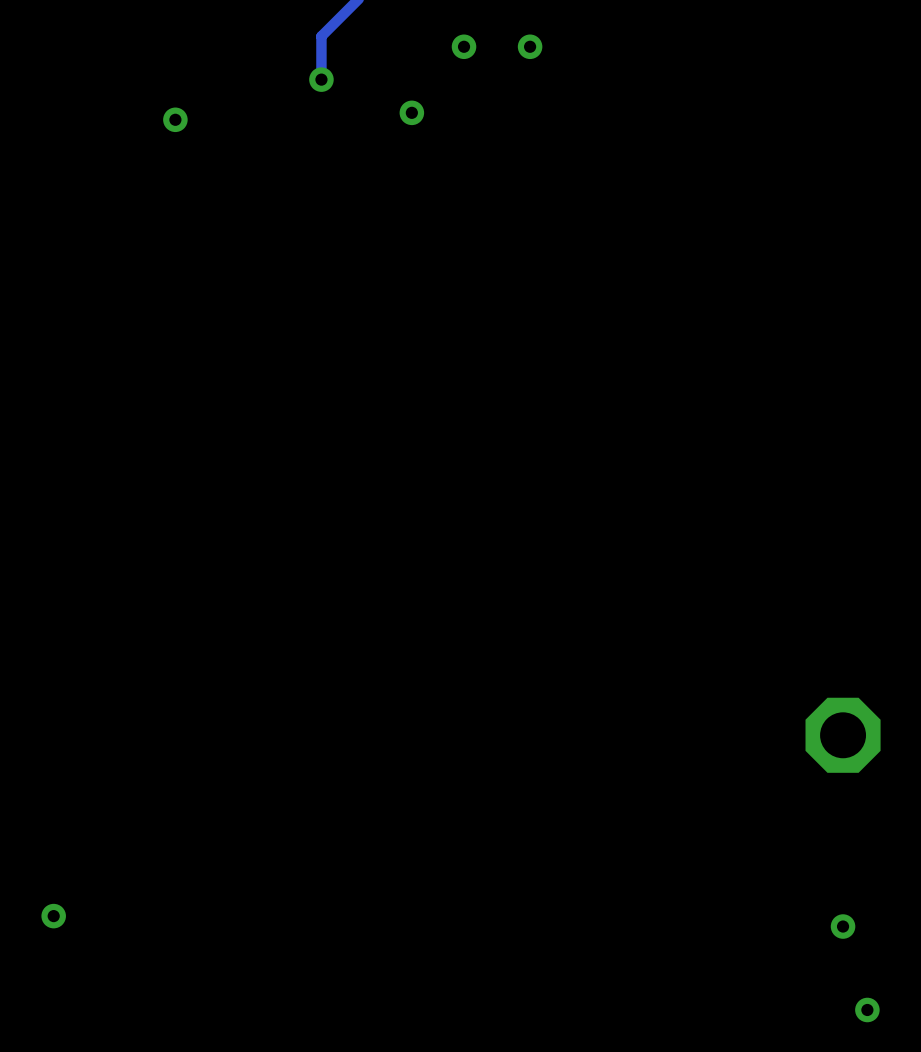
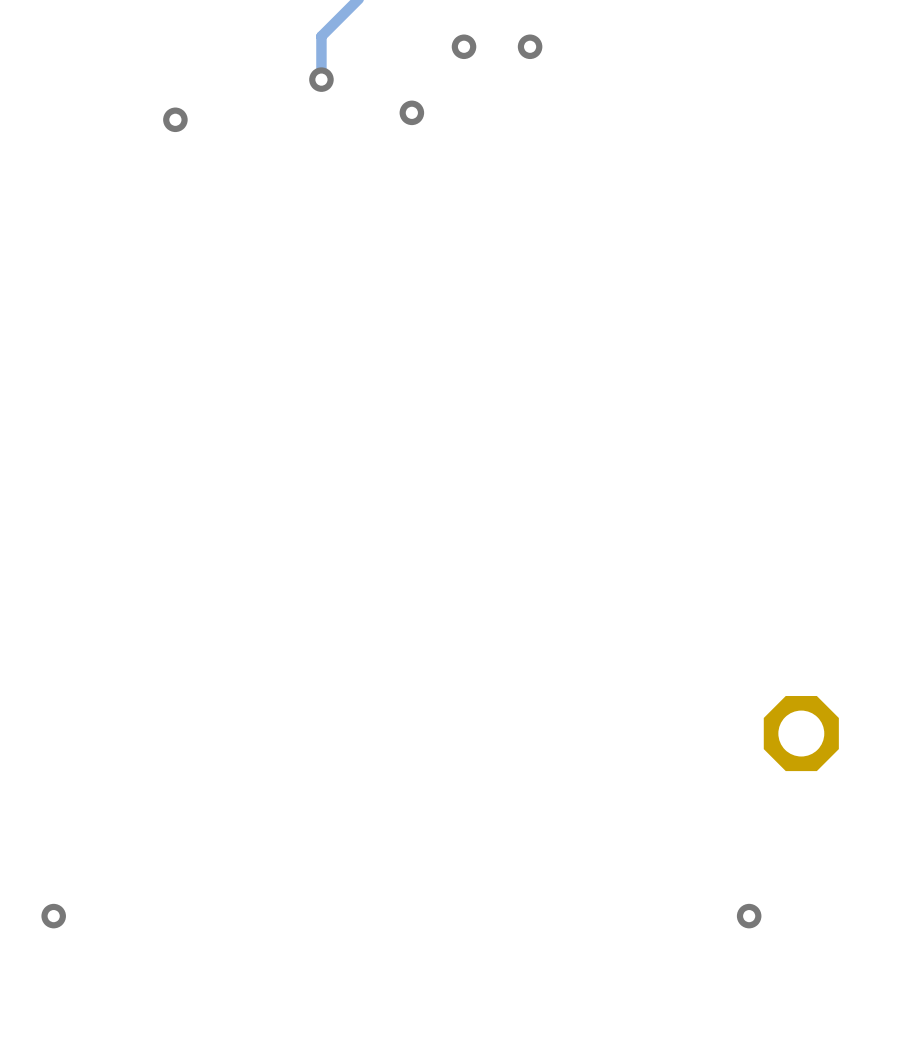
part position: (843, 735) -> (801, 733)
via: none -> (749, 916)
via: (843, 926) -> none
via: (867, 1009) -> none

